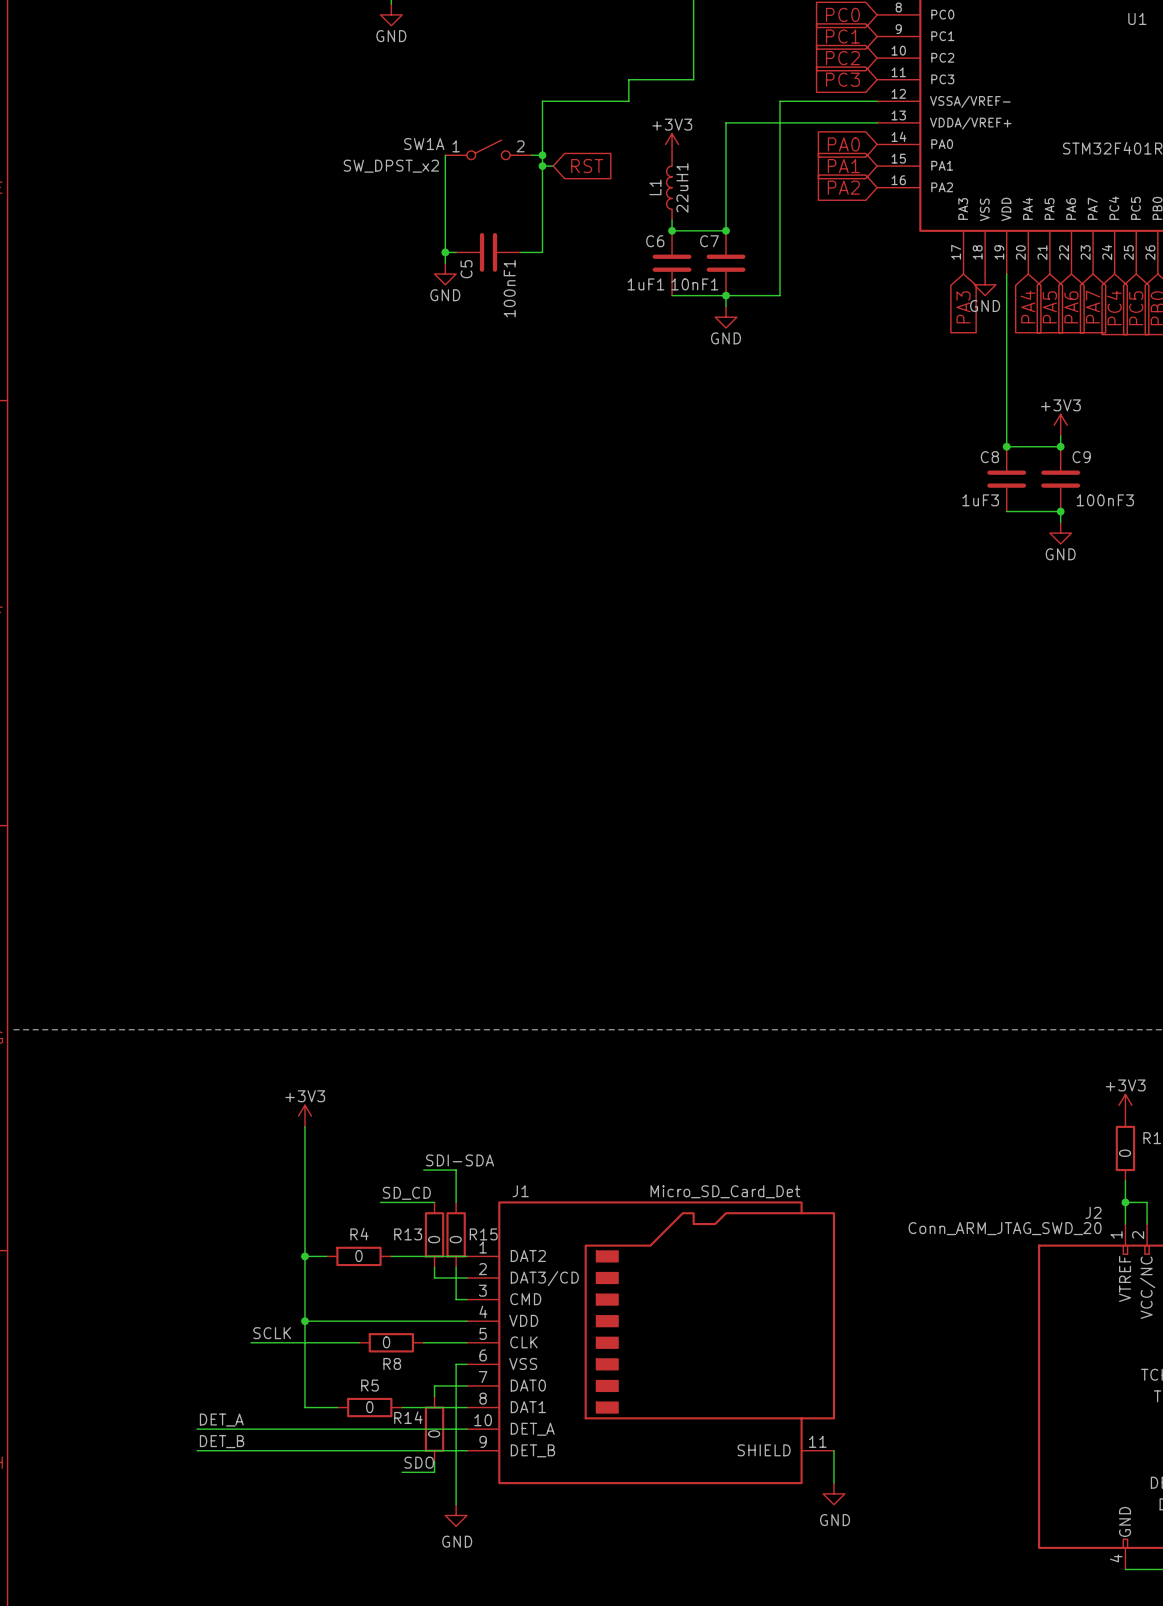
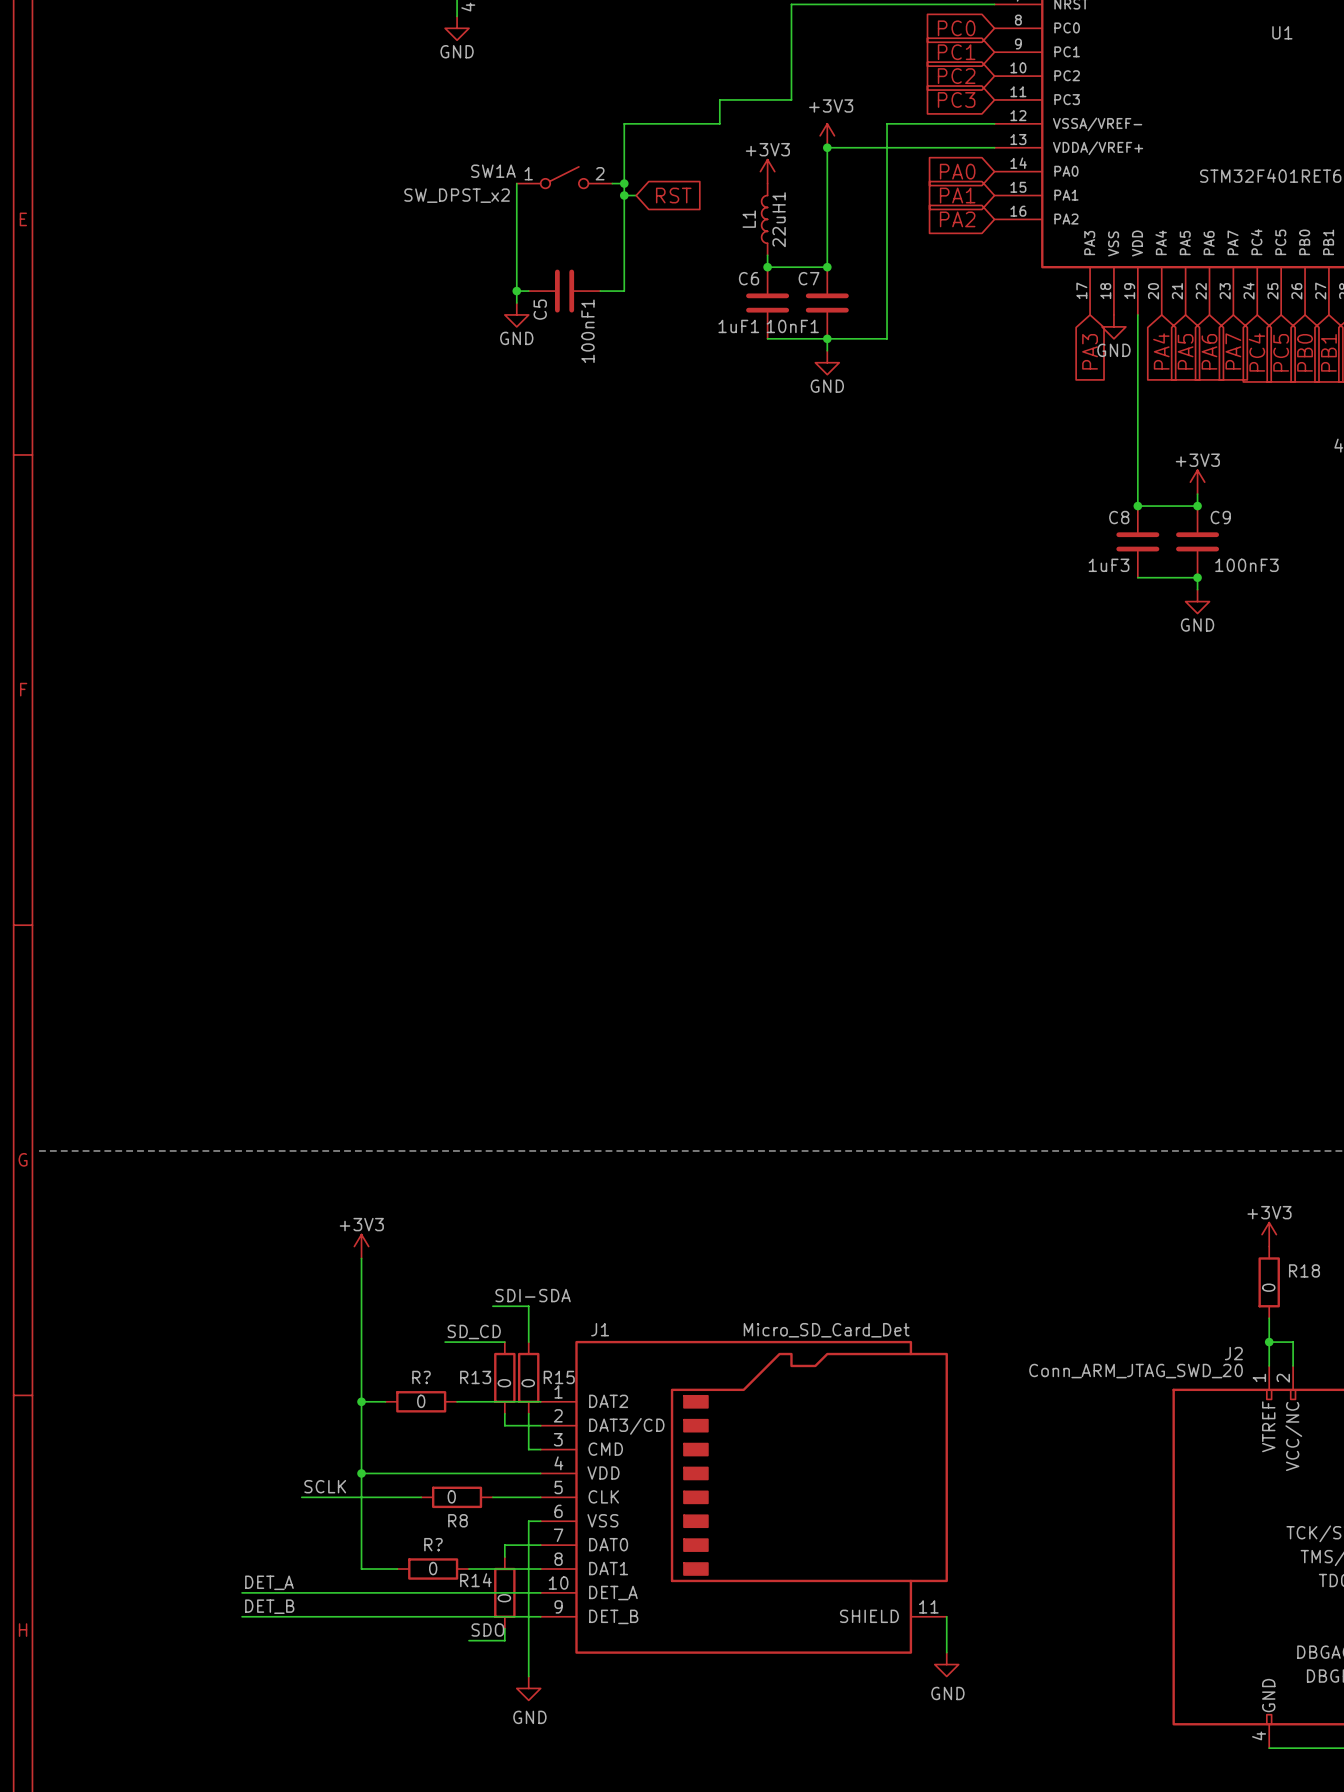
power symbol: none -> +3V3 (827, 135)
junction: none -> (827, 147)
R4 name: R4 (359, 1234) -> R? (421, 1377)
R5 name: R5 (370, 1385) -> R? (433, 1544)

